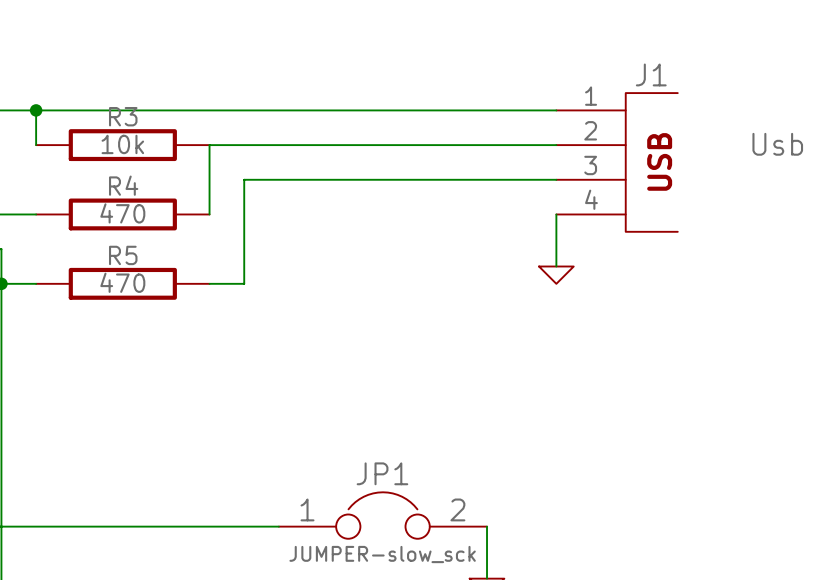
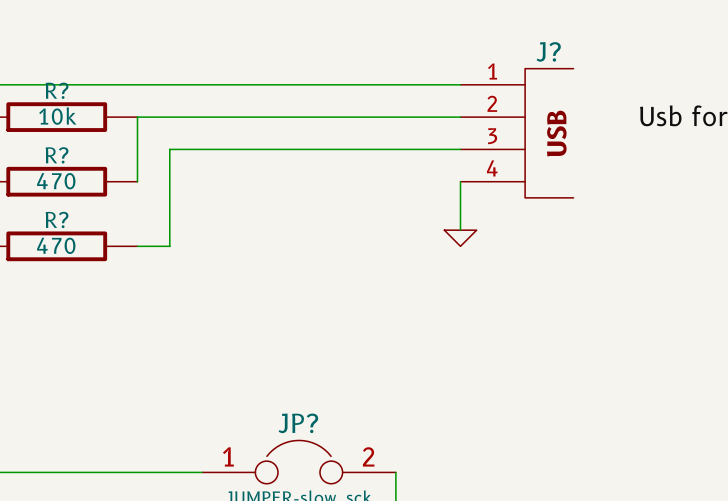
J1 name: J1 (651, 74) -> J? (548, 51)
R3 name: R3 (123, 116) -> R? (57, 90)
R4 name: R4 (123, 185) -> R? (57, 155)
R5 name: R5 (123, 255) -> R? (57, 219)
JP1 name: JP1 (382, 473) -> JP? (298, 423)

